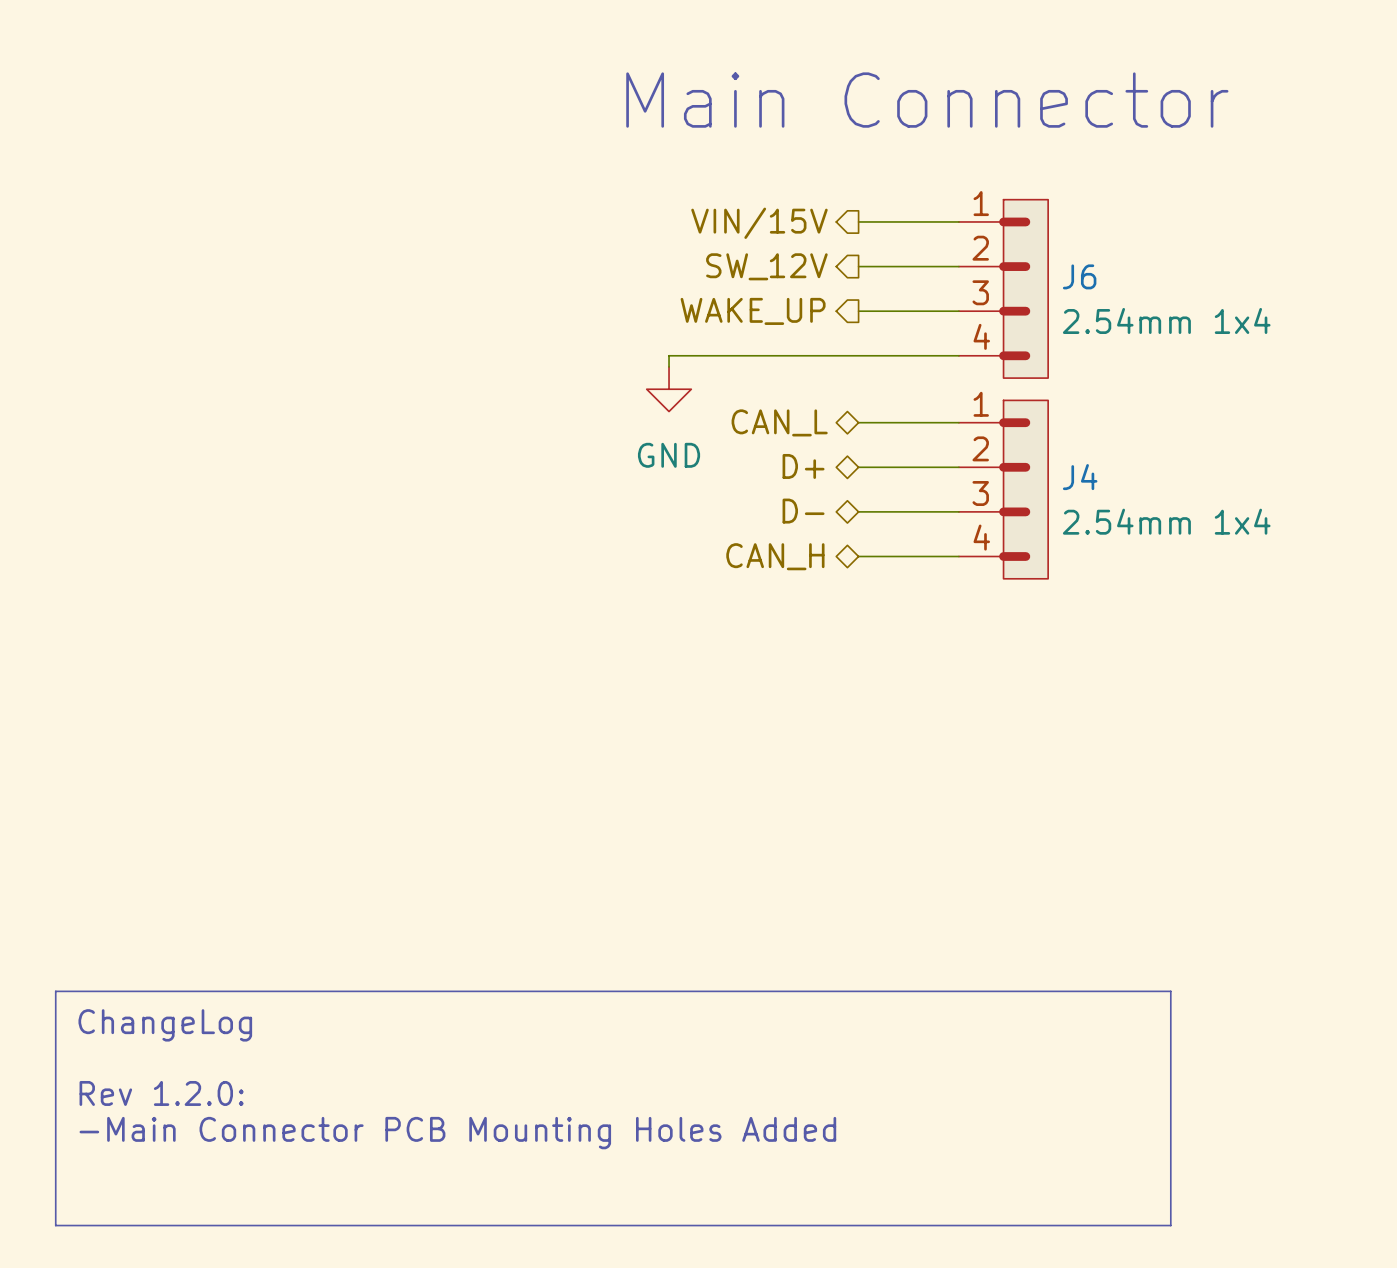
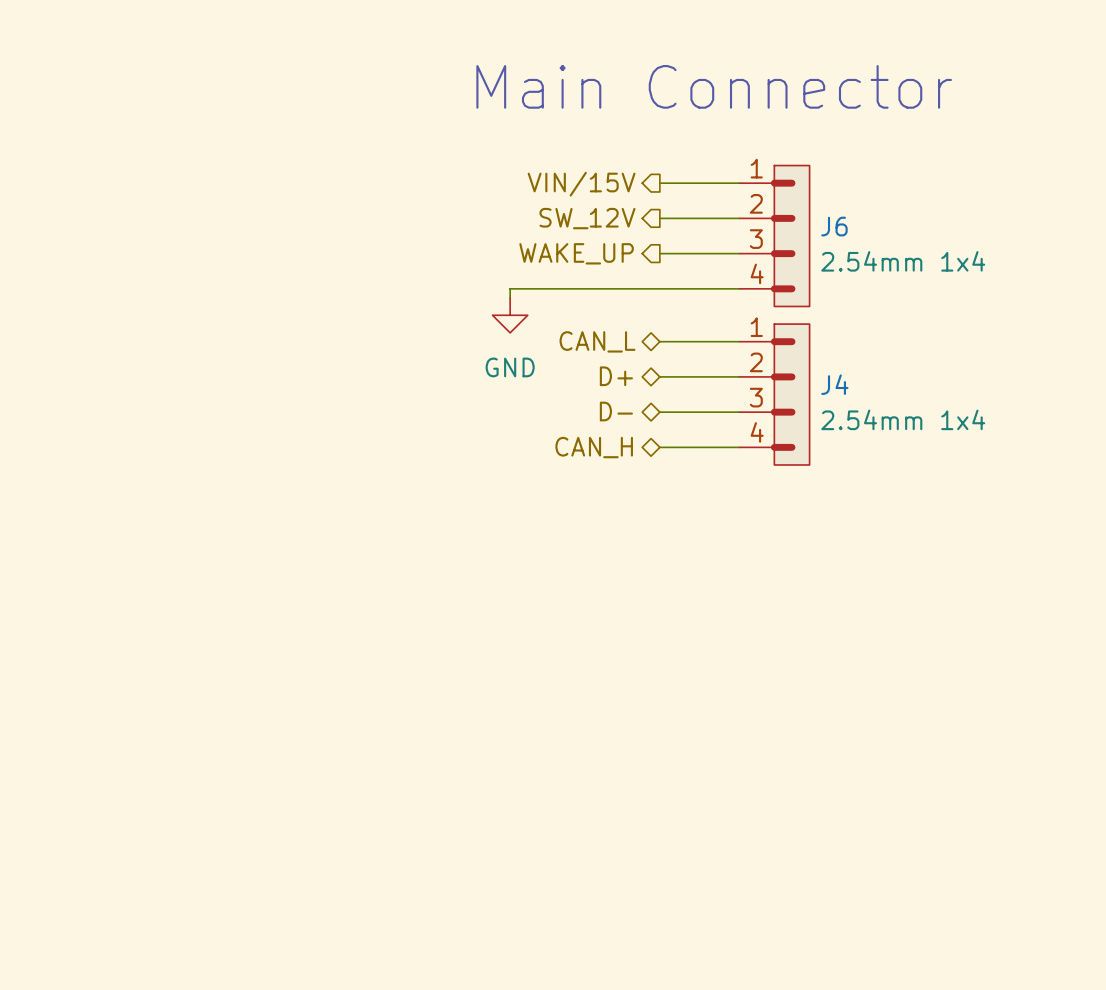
line: (55, 991) (1170, 991) (1170, 1225) (55, 1225) (55, 991) -> none
text: ChangeLog (165, 1025) -> none
text: Rev 1.2.0: (161, 1093) -> none
text: -Main Connector PCB Mounting Holes Added (457, 1133) -> none

